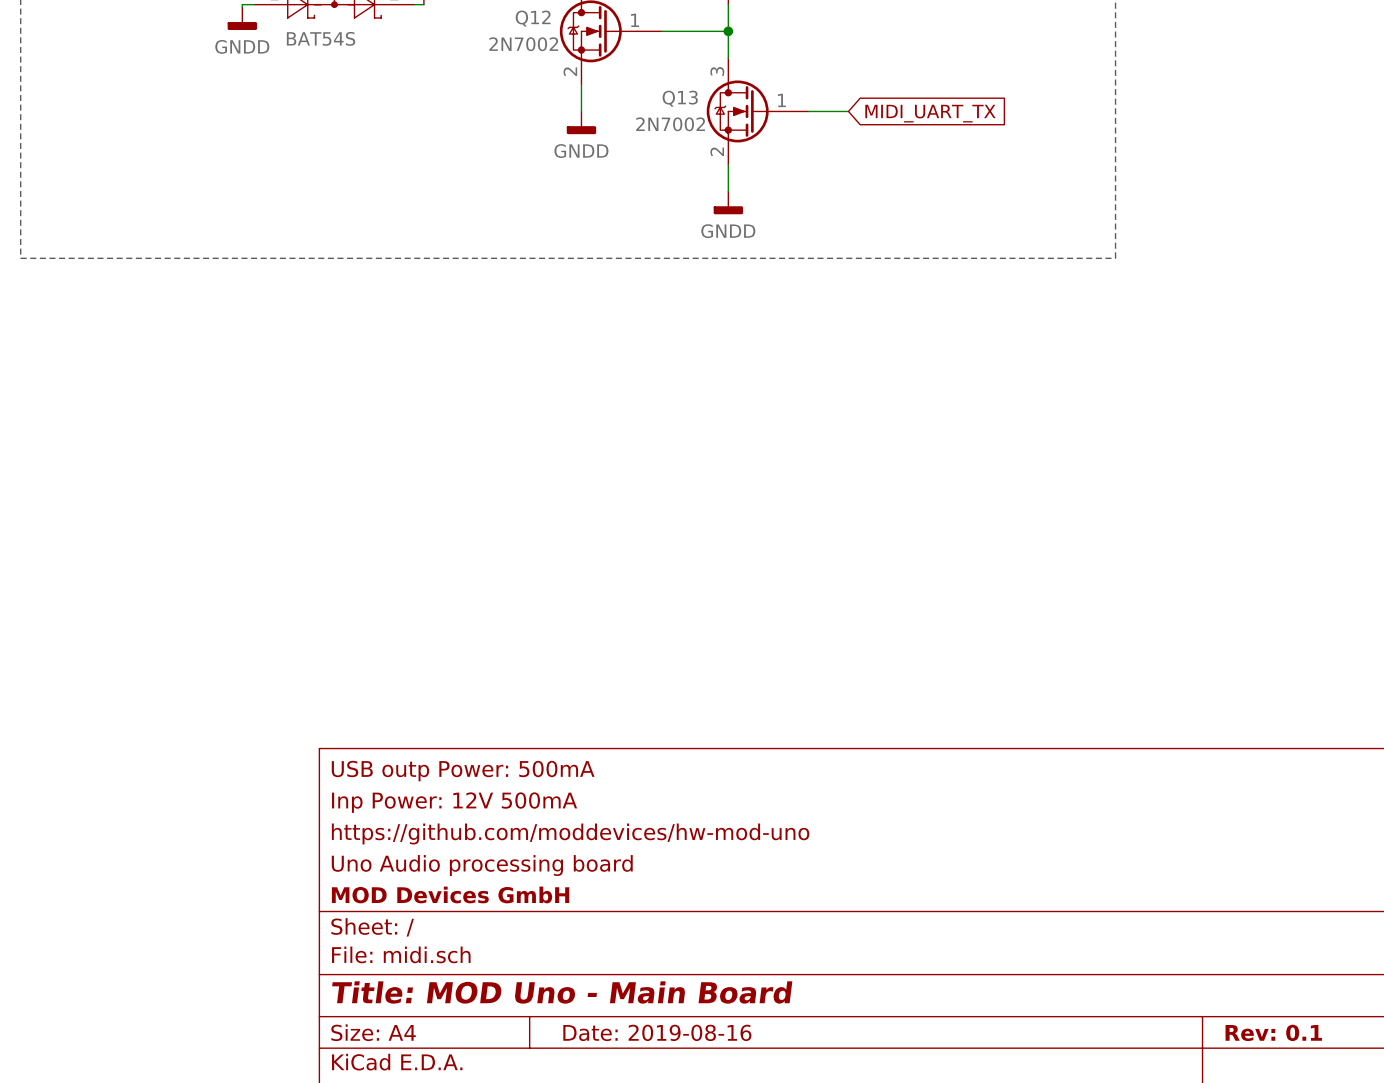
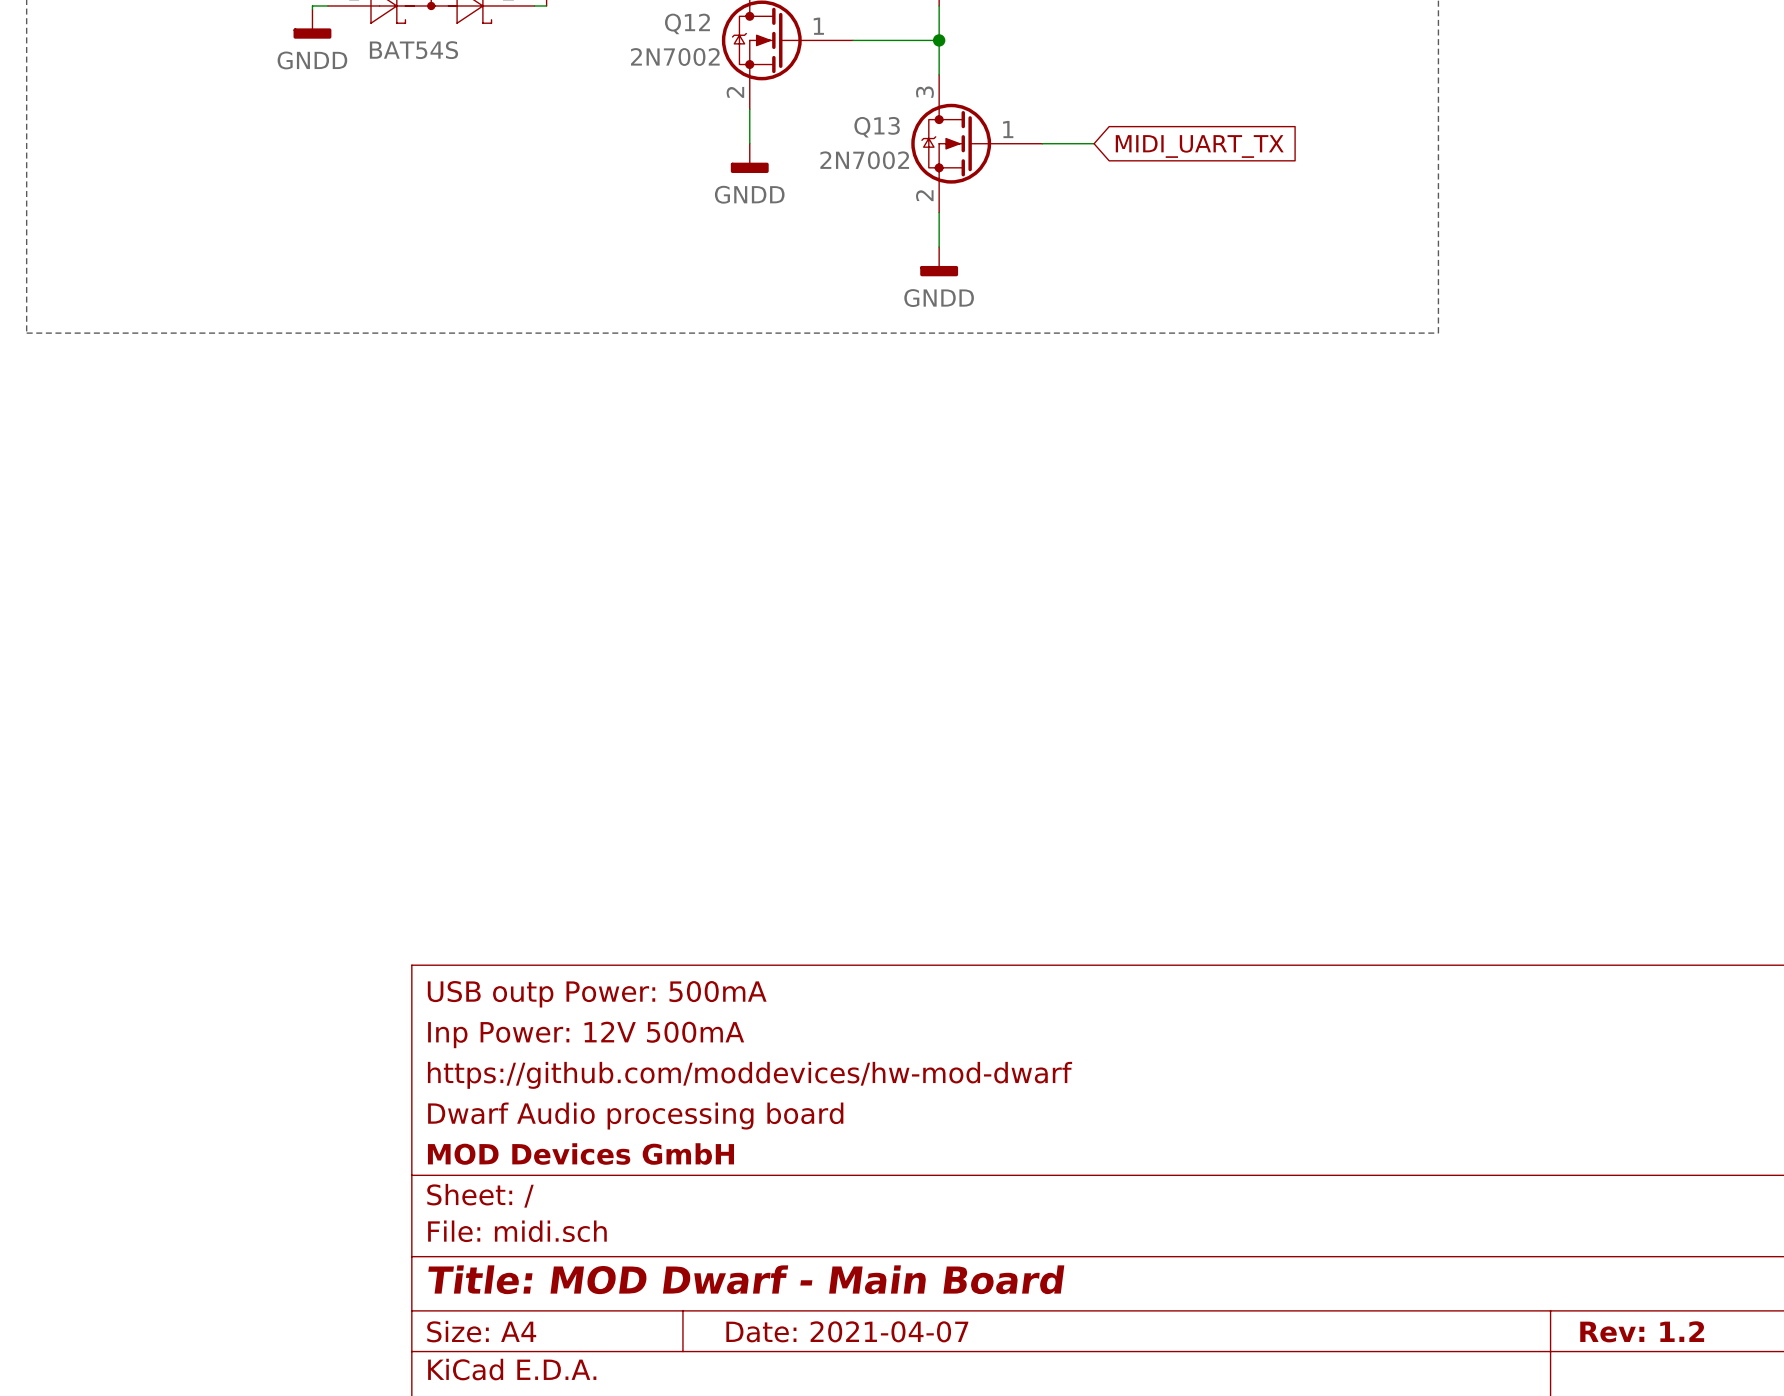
title block: https://github.com/moddevices/hw-mod-uno (570, 833) -> https://github.com/moddevices/hw-mod-dwarf (750, 1075)
title block: Uno Audio processing board (482, 865) -> Dwarf Audio processing board (635, 1116)
title block: Title: MOD Uno - Main Board (562, 992) -> Title: MOD Dwarf - Main Board (746, 1279)
title block: Date: 2019-08-16 (657, 1032) -> Date: 2021-04-07 (847, 1331)
title block: Rev: 0.1 (1273, 1032) -> Rev: 1.2 (1642, 1331)

